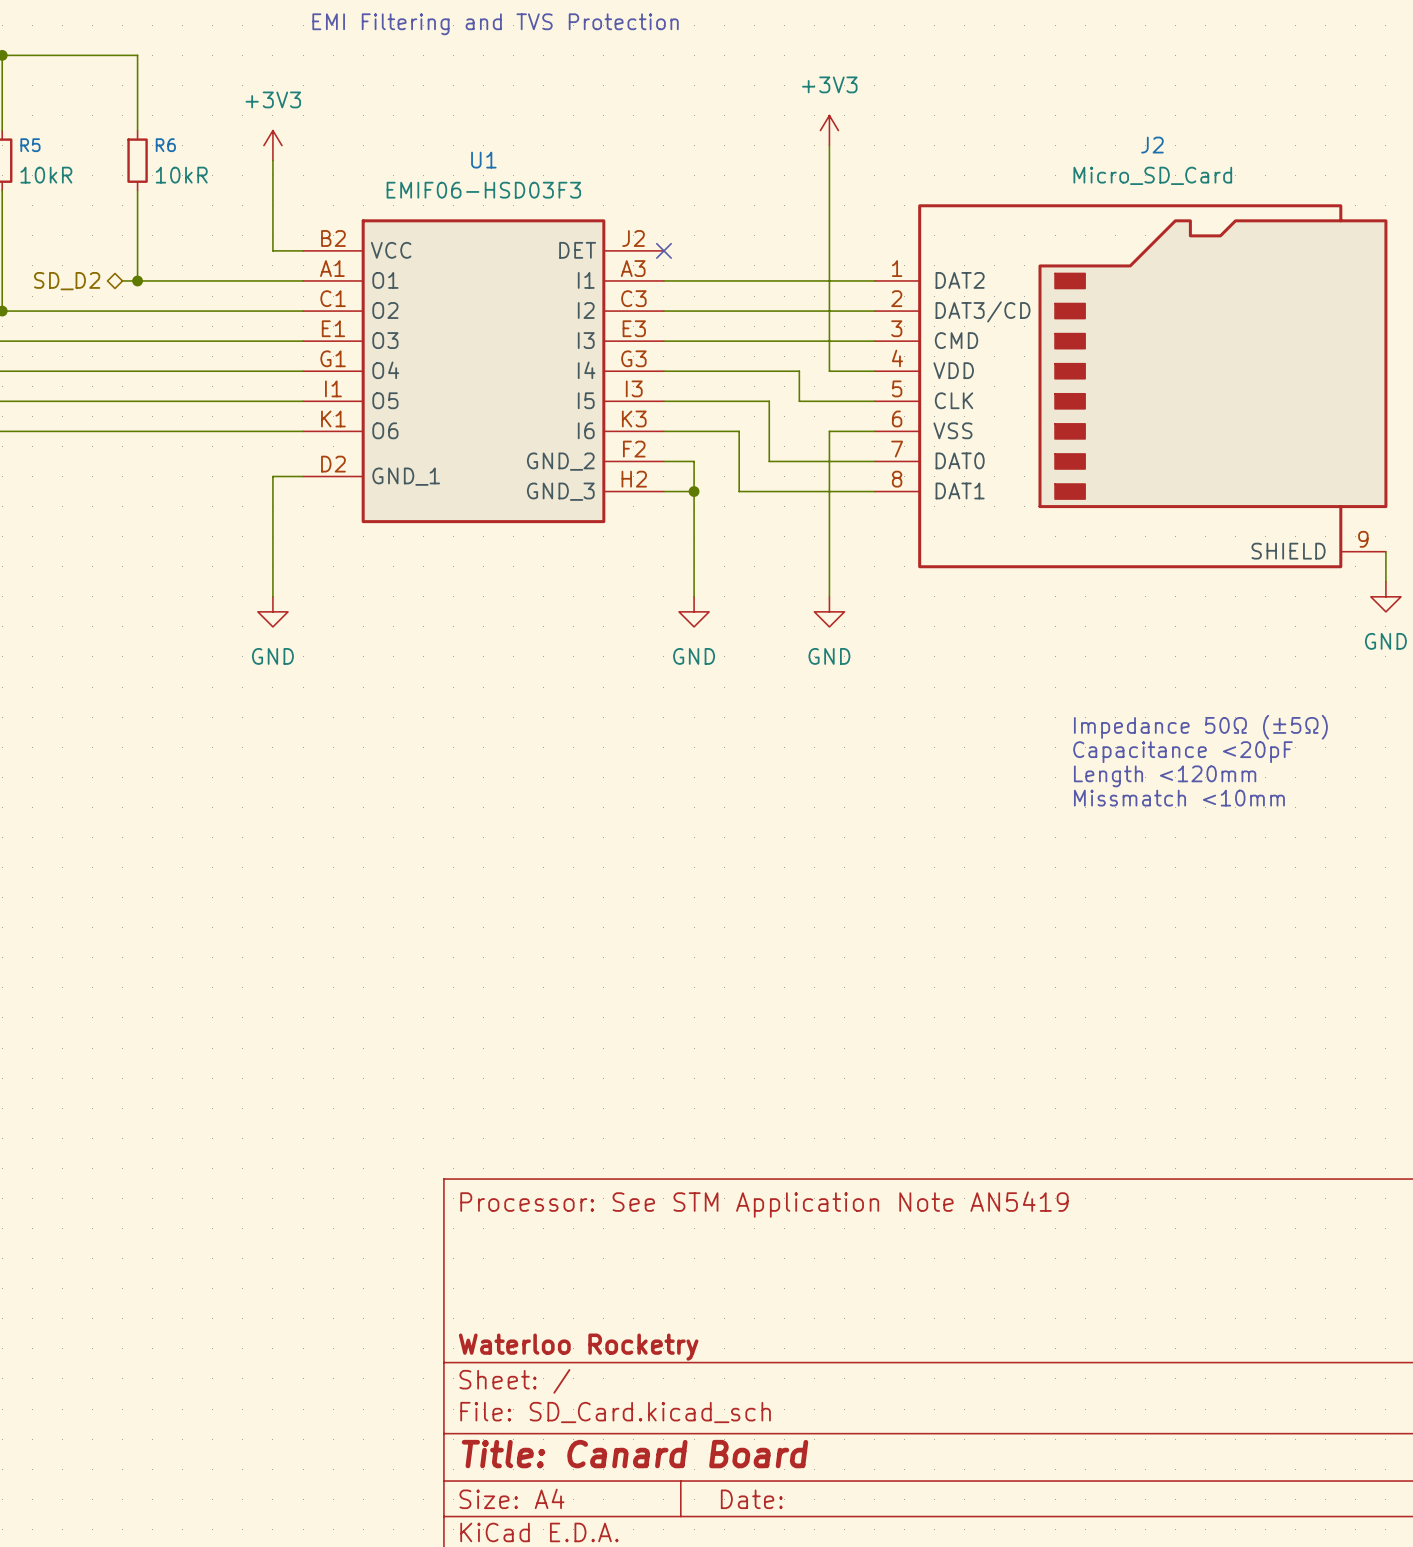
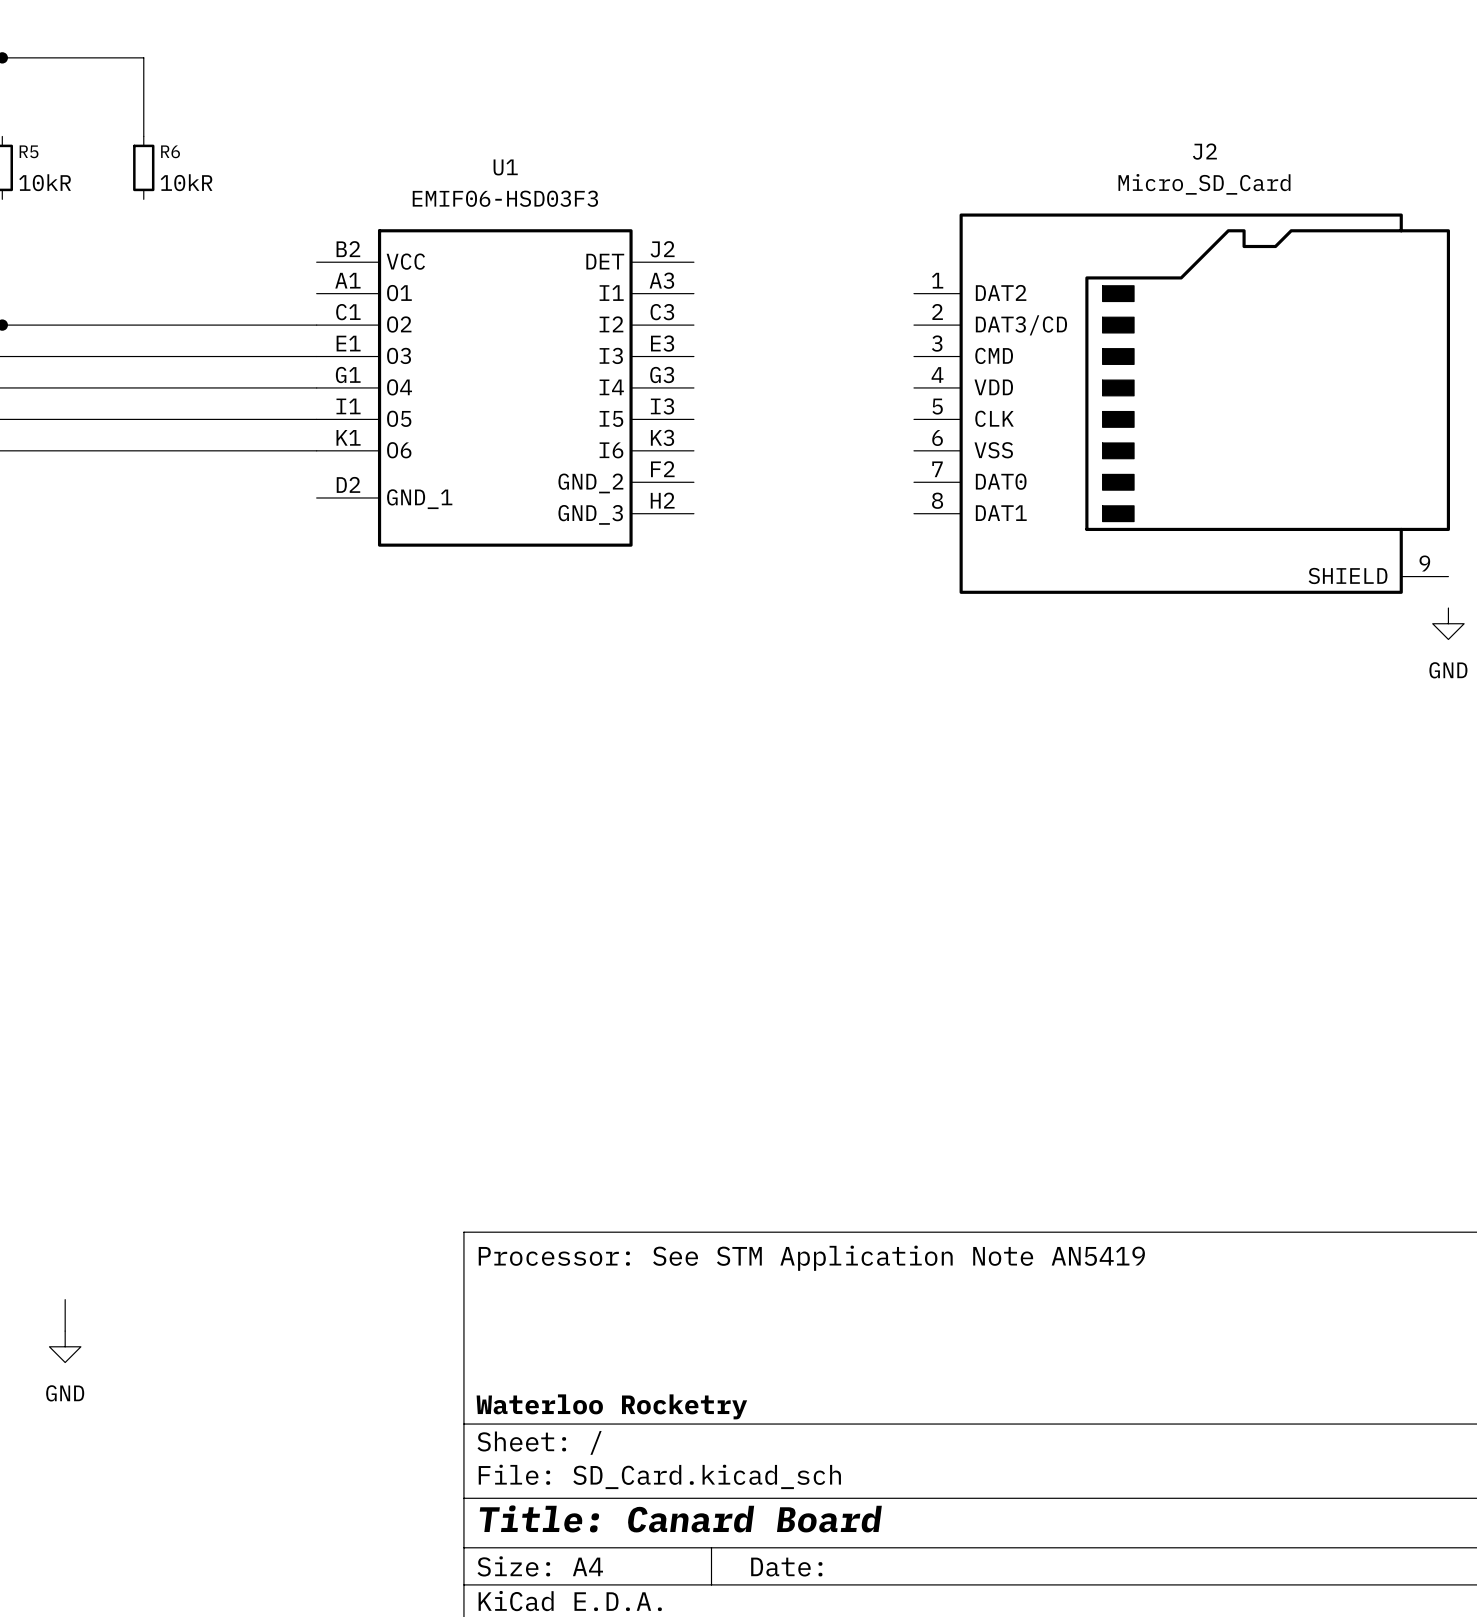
text: EMI Filtering and TVS Protection (495, 24) -> none
wire: (2, 55) (2, 130) -> none
power symbol: +3V3 (829, 130) -> none
power symbol: +3V3 (272, 145) -> none
wire: (829, 145) (829, 371) (874, 371) -> none
wire: (272, 160) (272, 250) (303, 250) -> none
wire: (2, 190) (2, 311) -> none
wire: (137, 190) (137, 280) -> none
no-connect mark: (663, 250) -> none
wire: (122, 280) (303, 280) -> none
junction: (137, 280) -> none
wire: (663, 280) (874, 280) -> none
hierarchical label: SD_D2 (67, 281) -> none
wire: (663, 311) (874, 311) -> none
wire: (663, 341) (874, 341) -> none
wire: (663, 371) (799, 371) (799, 401) (874, 401) -> none
wire: (663, 401) (769, 401) (769, 461) (874, 461) -> none
wire: (663, 431) (739, 431) (739, 491) (874, 491) -> none
wire: (874, 431) (829, 431) (829, 596) -> none
wire: (663, 461) (694, 461) (694, 596) -> none
wire: (303, 476) (272, 476) (272, 596) -> none
wire: (663, 491) (694, 491) -> none
junction: (694, 491) -> none
wire: (1385, 551) (1385, 581) -> none
power symbol: GND (272, 611) -> none
power symbol: GND (694, 611) -> none
power symbol: GND (829, 611) -> none
text: Impedance 50Ω (±5Ω) (1200, 727) -> none
text: Capacitance <20pF (1182, 752) -> none
text: Length <120mm (1165, 776) -> none
text: Missmatch <10mm (1179, 798) -> none
wire: none -> (65, 1299) (65, 1331)
power symbol: none -> GND (65, 1346)

